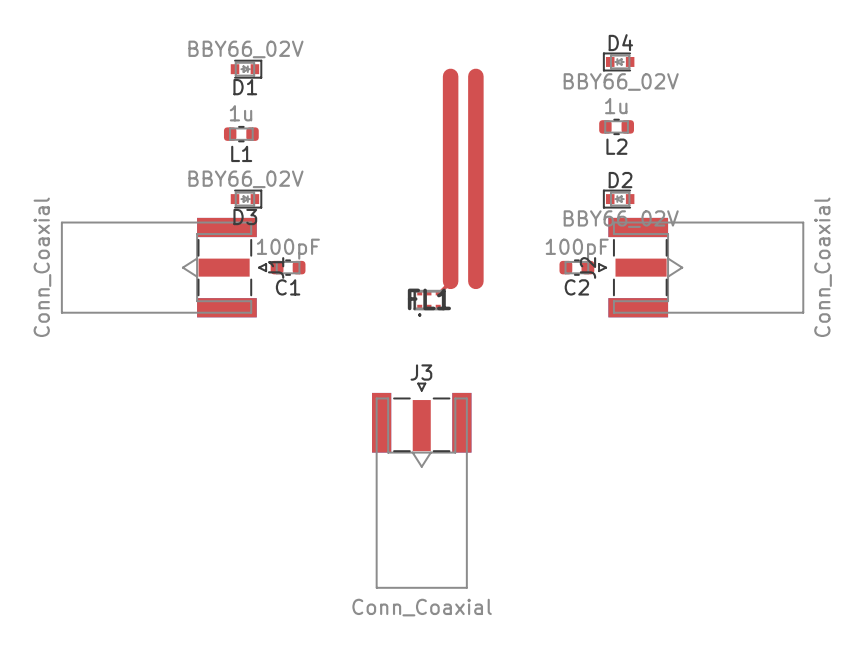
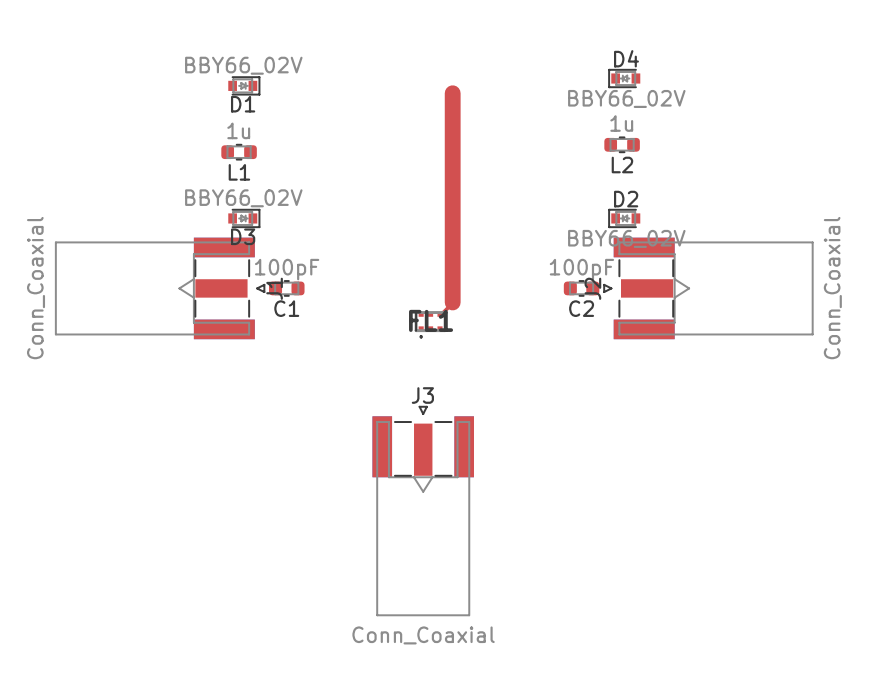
top track: (475, 76) (475, 281) -> none

